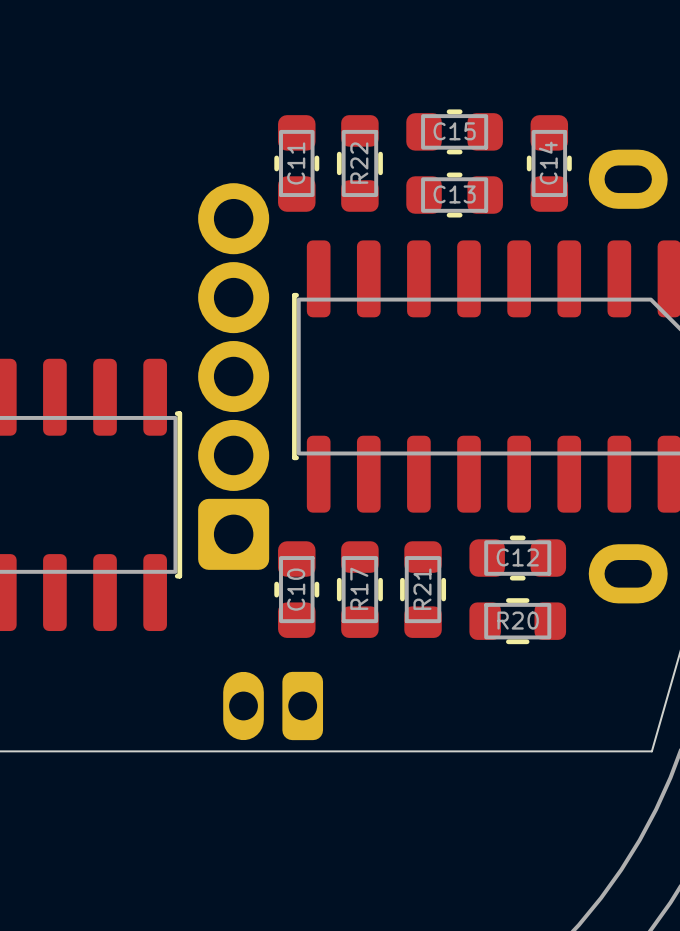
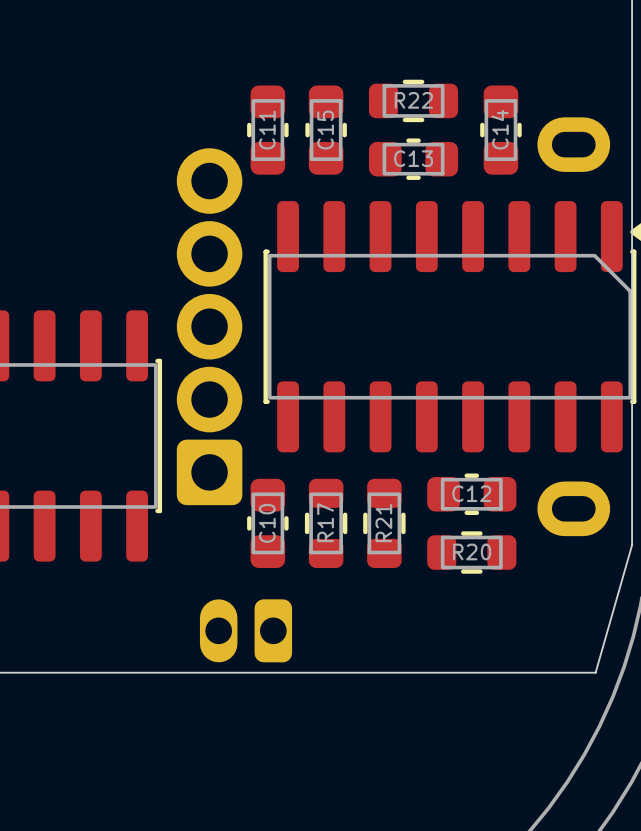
C15 rotation: 0° (454, 131) -> 90° clockwise (326, 130)
C15 position: (454, 131) -> (326, 130)
R22 rotation: 0° (359, 163) -> 90° clockwise (413, 100)
R22 position: (359, 163) -> (413, 100)

